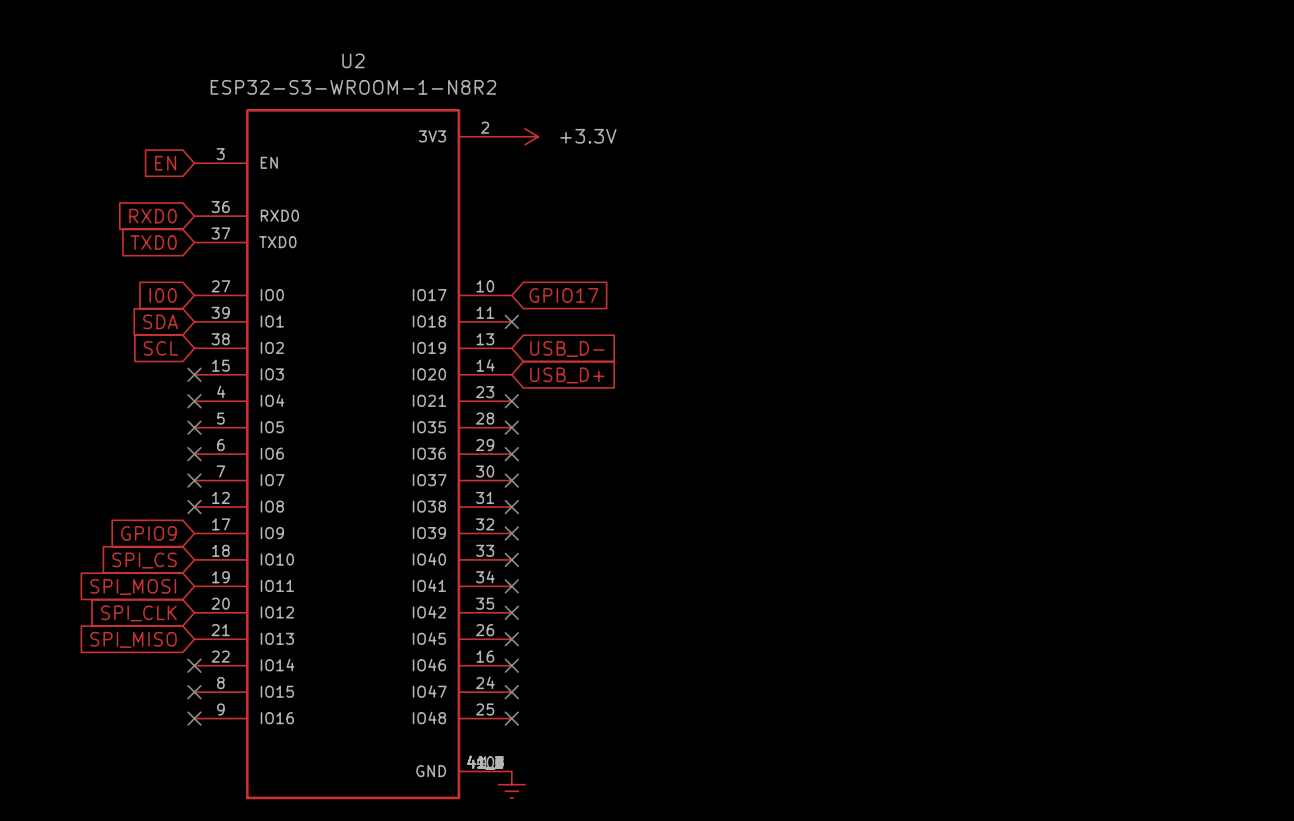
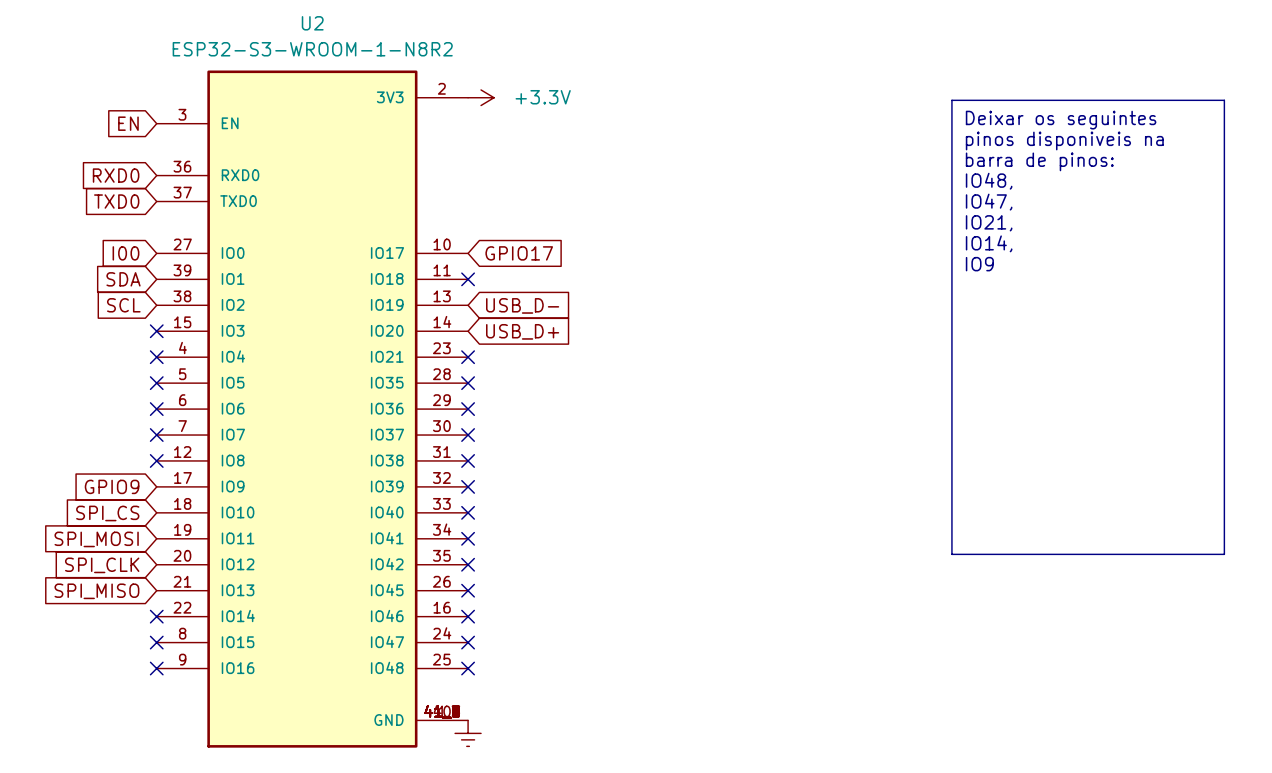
line: none -> (951, 100) (1224, 100) (1224, 554) (951, 554) (951, 100)
text: none -> Deixar os seguintes (1061, 120)
text: none -> pinos disponiveis na (1064, 140)
text: none -> barra de pinos: (1039, 161)
text: none -> IO48, (989, 181)
text: none -> IO47, (989, 202)
text: none -> IO21, (989, 223)
text: none -> IO14, (989, 243)
text: none -> IO9 (979, 264)

